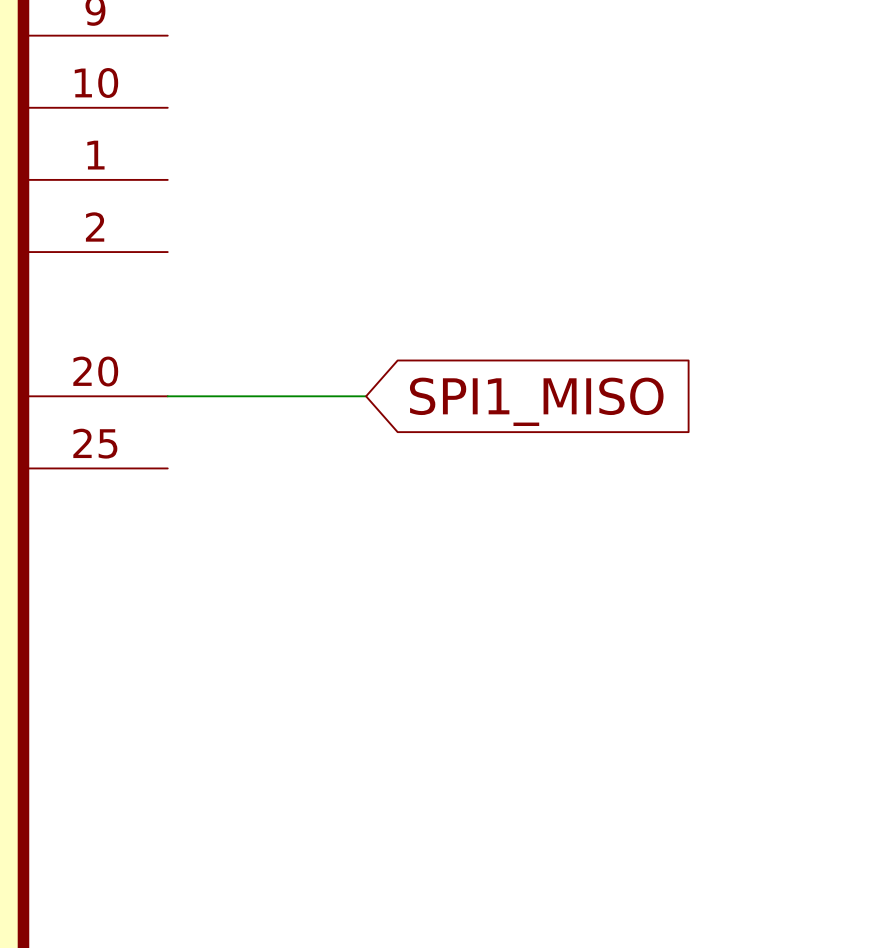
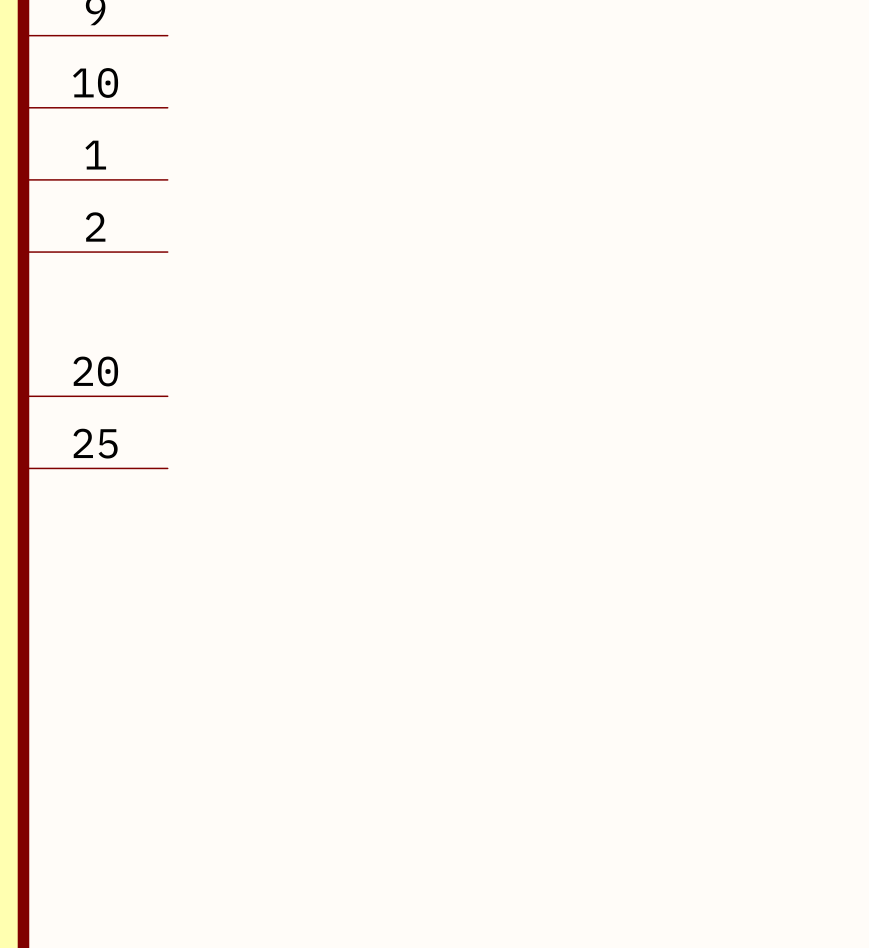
wire: (167, 396) (366, 396) -> none
global label: SPI1_MISO (536, 401) -> none

